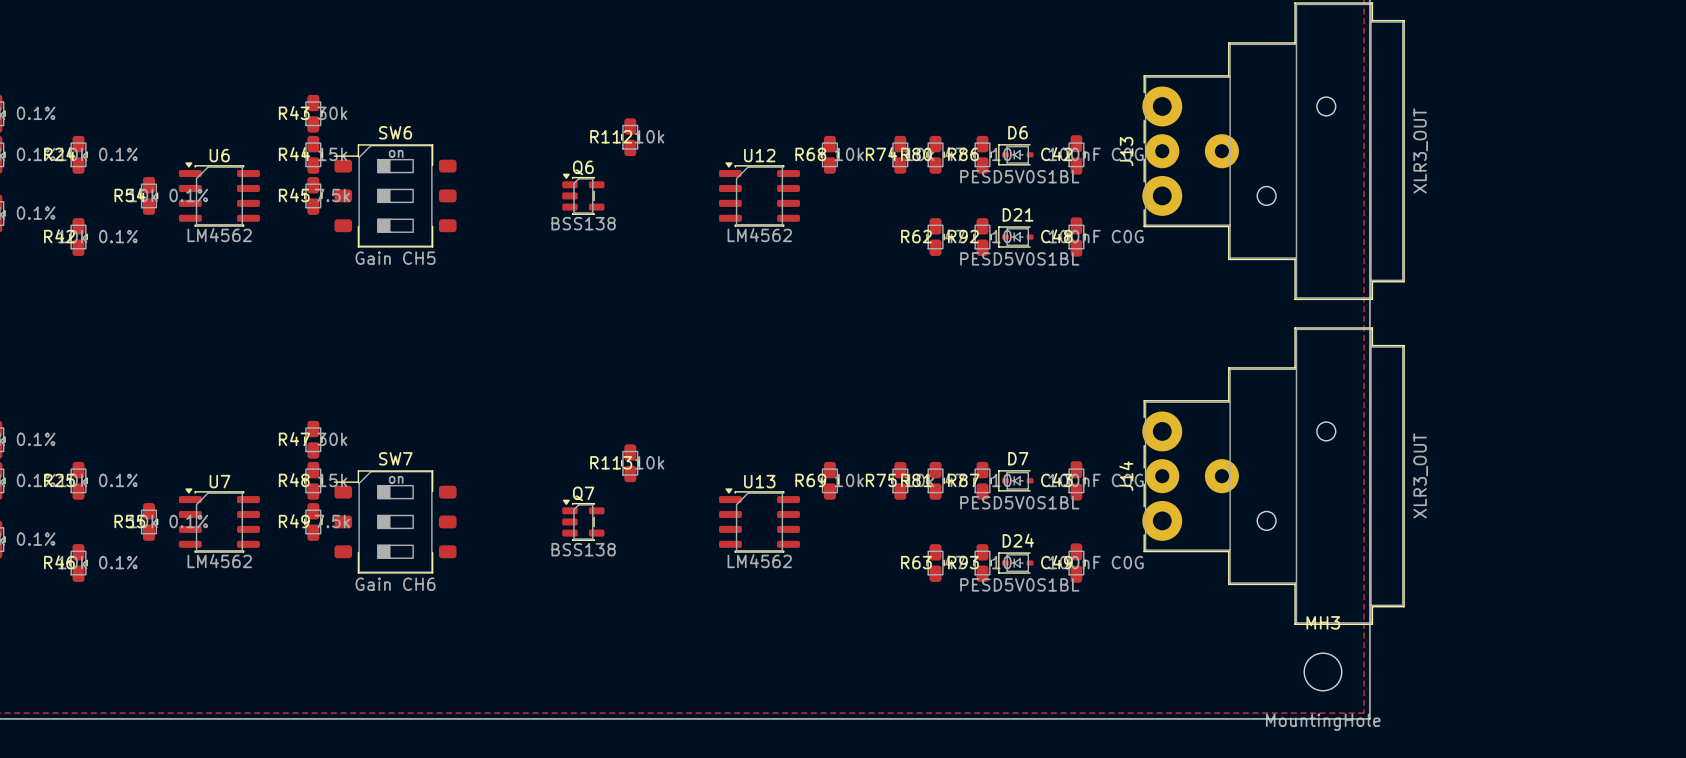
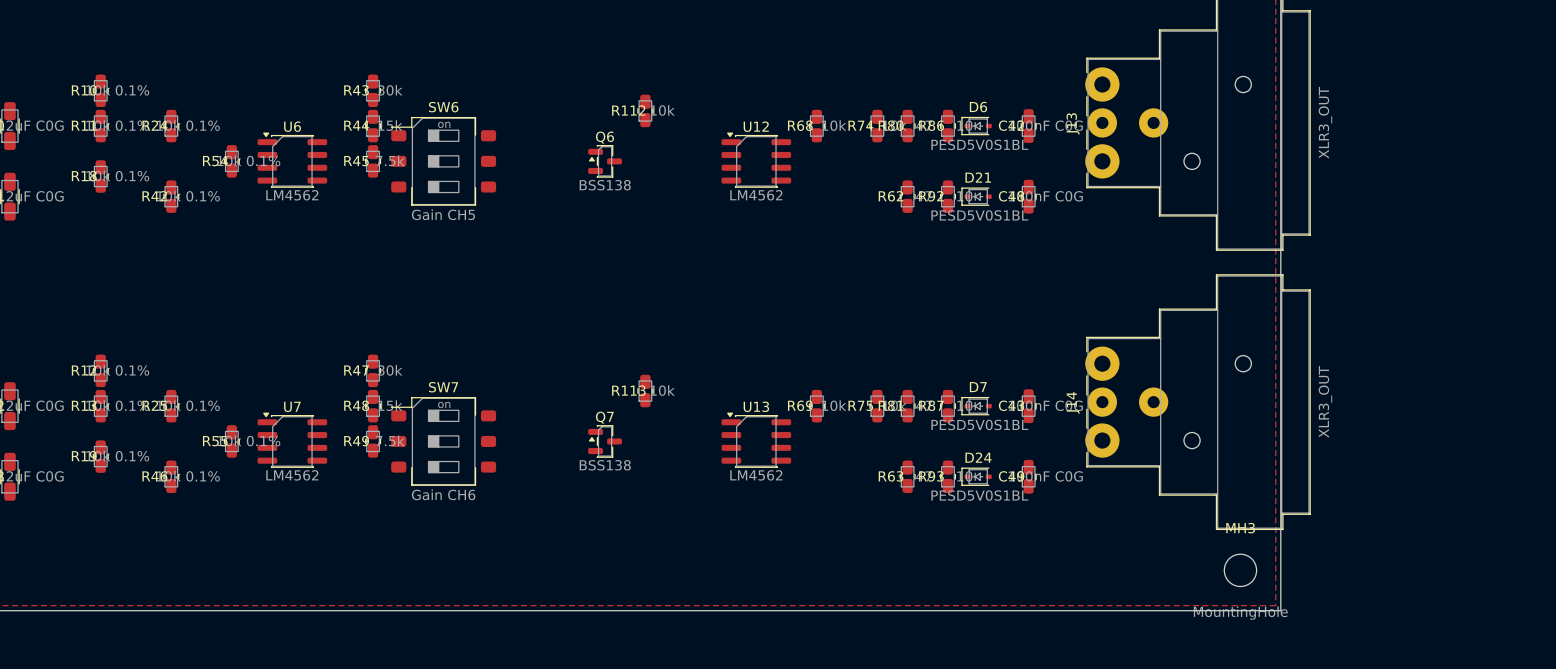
Q6 footprint: [562, 173, 605, 215] -> [588, 145, 622, 178]
Q7 footprint: [562, 499, 605, 541] -> [588, 425, 622, 458]

